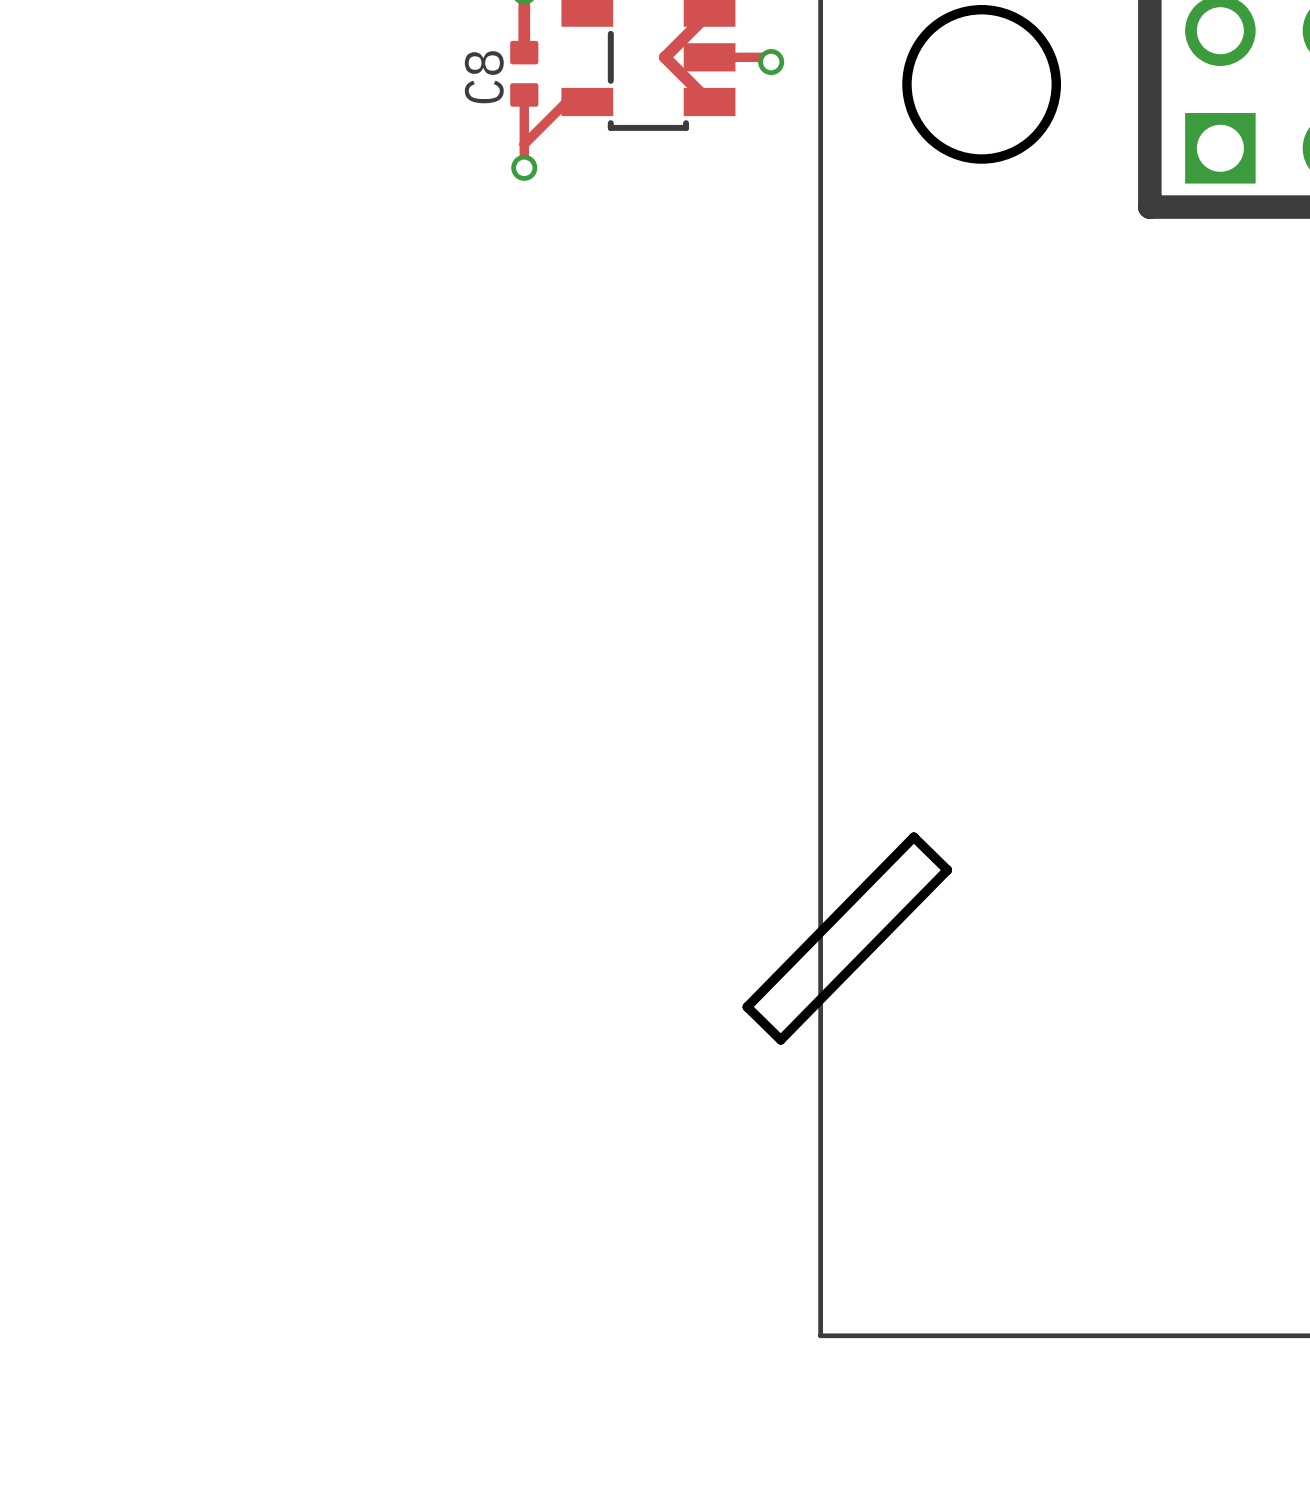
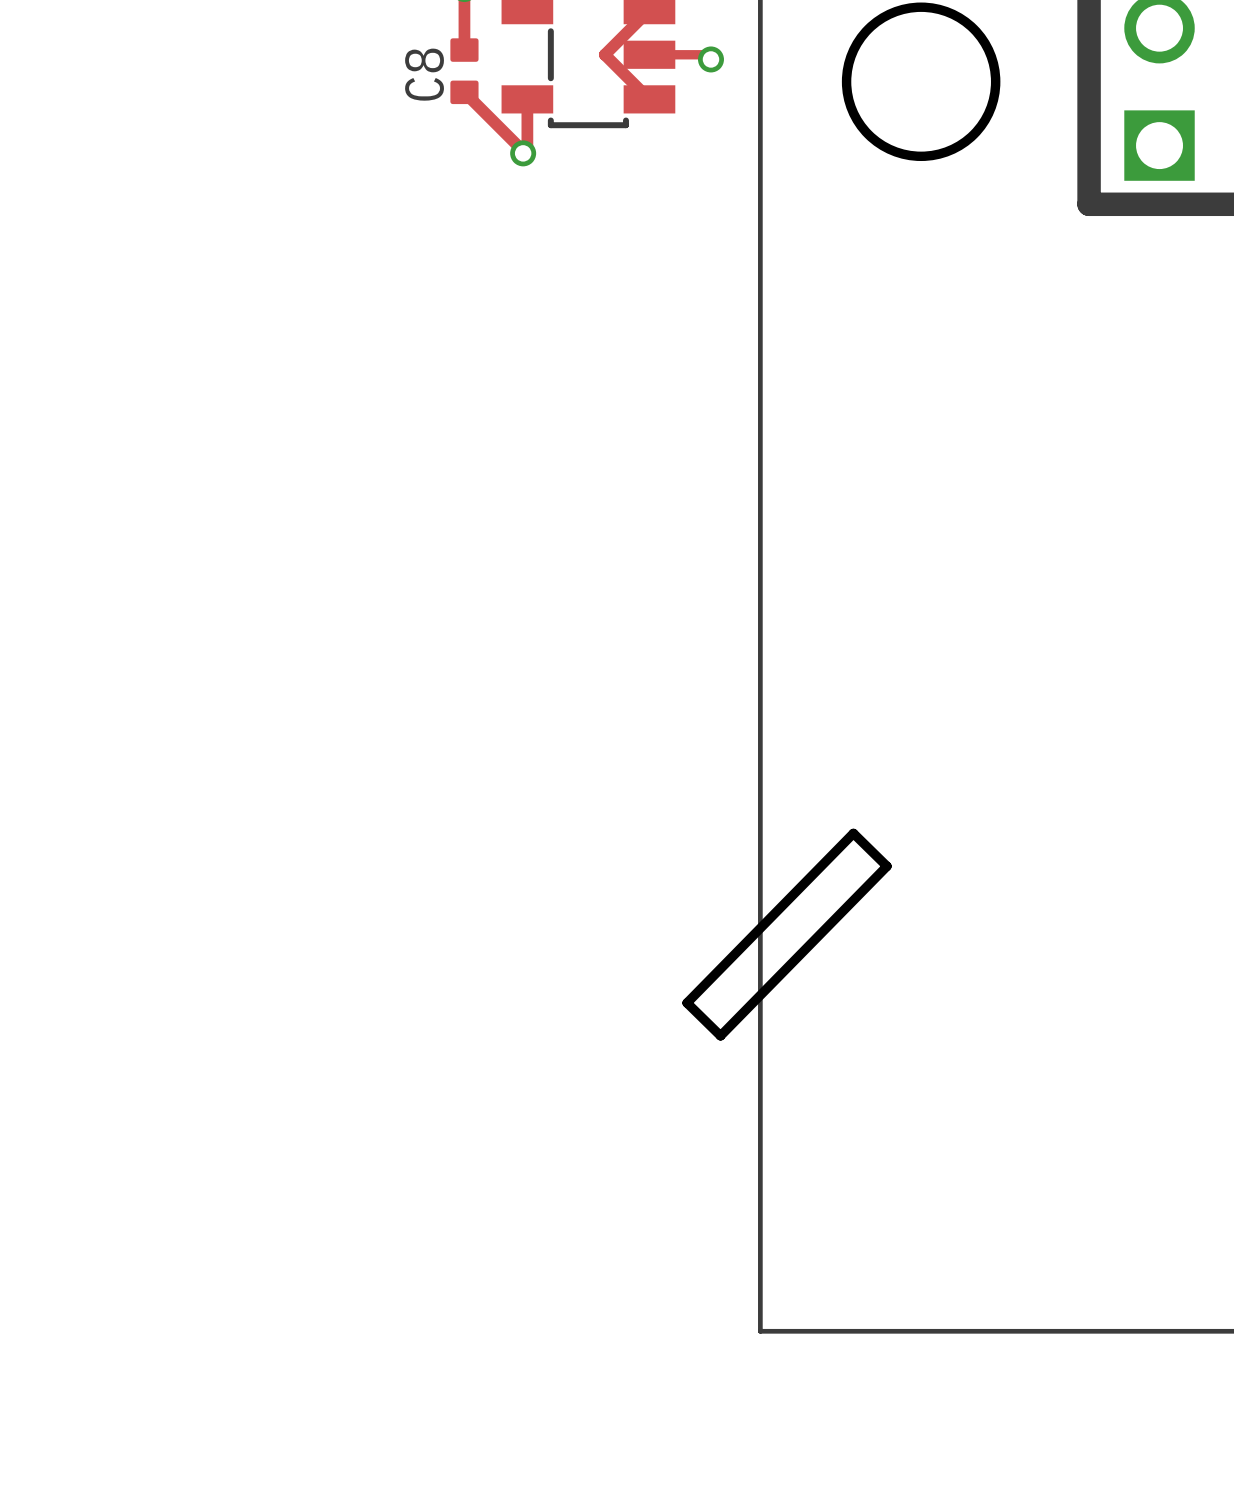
track: (524, 94) (524, 167) -> (464, 92) (523, 151) (523, 153) (527, 149) (527, 99)
track: (578, 102) (587, 102) (566, 102) (524, 144) -> none
via position: (524, 167) -> (523, 153)

